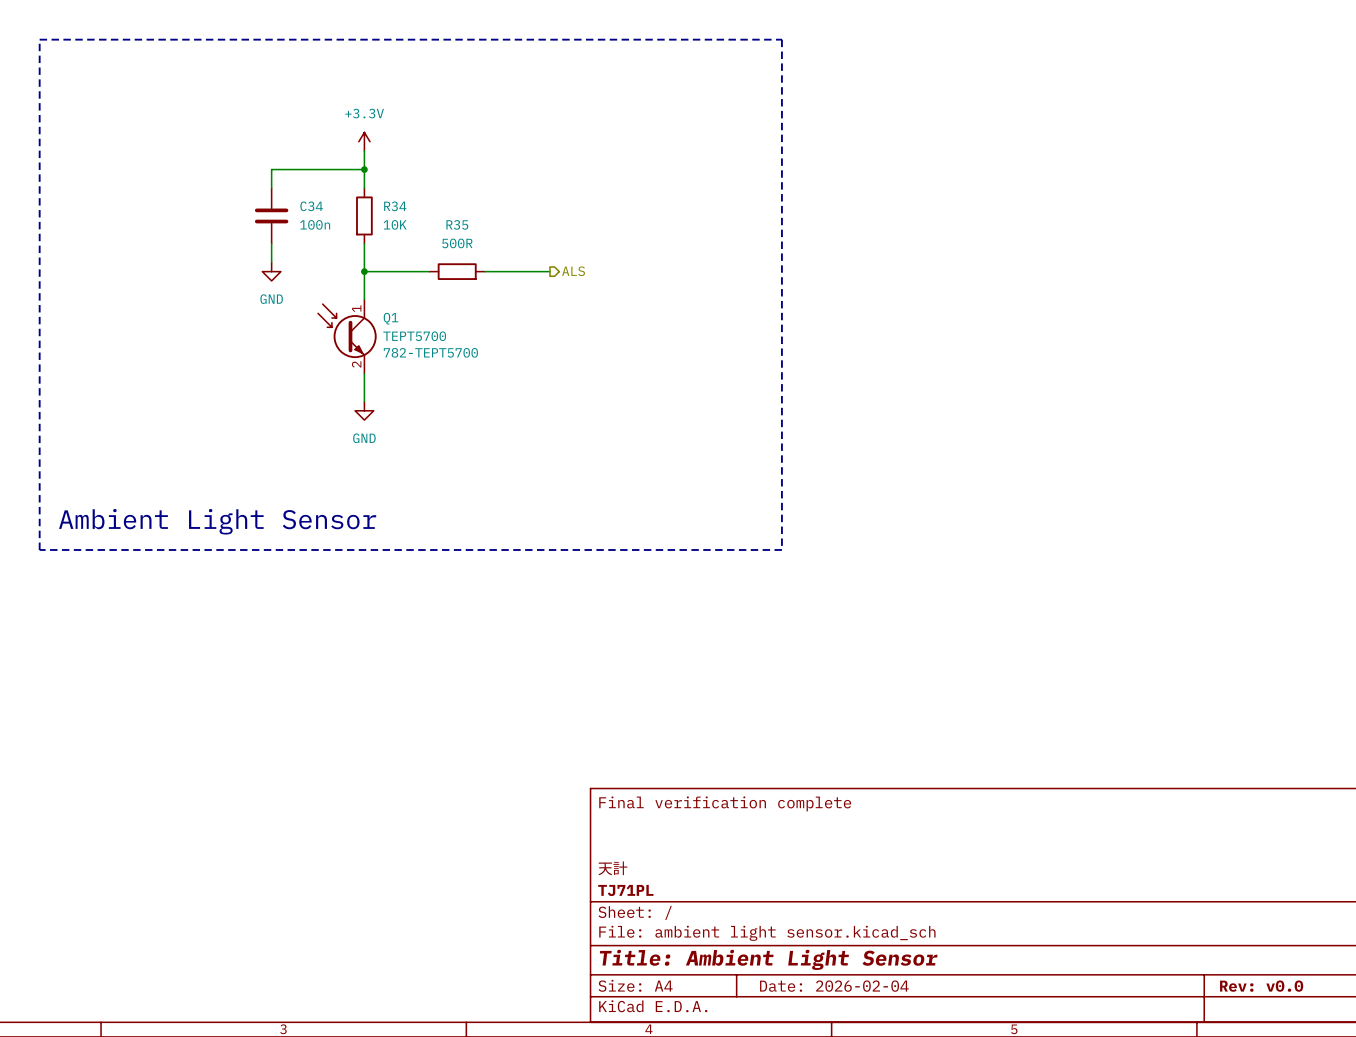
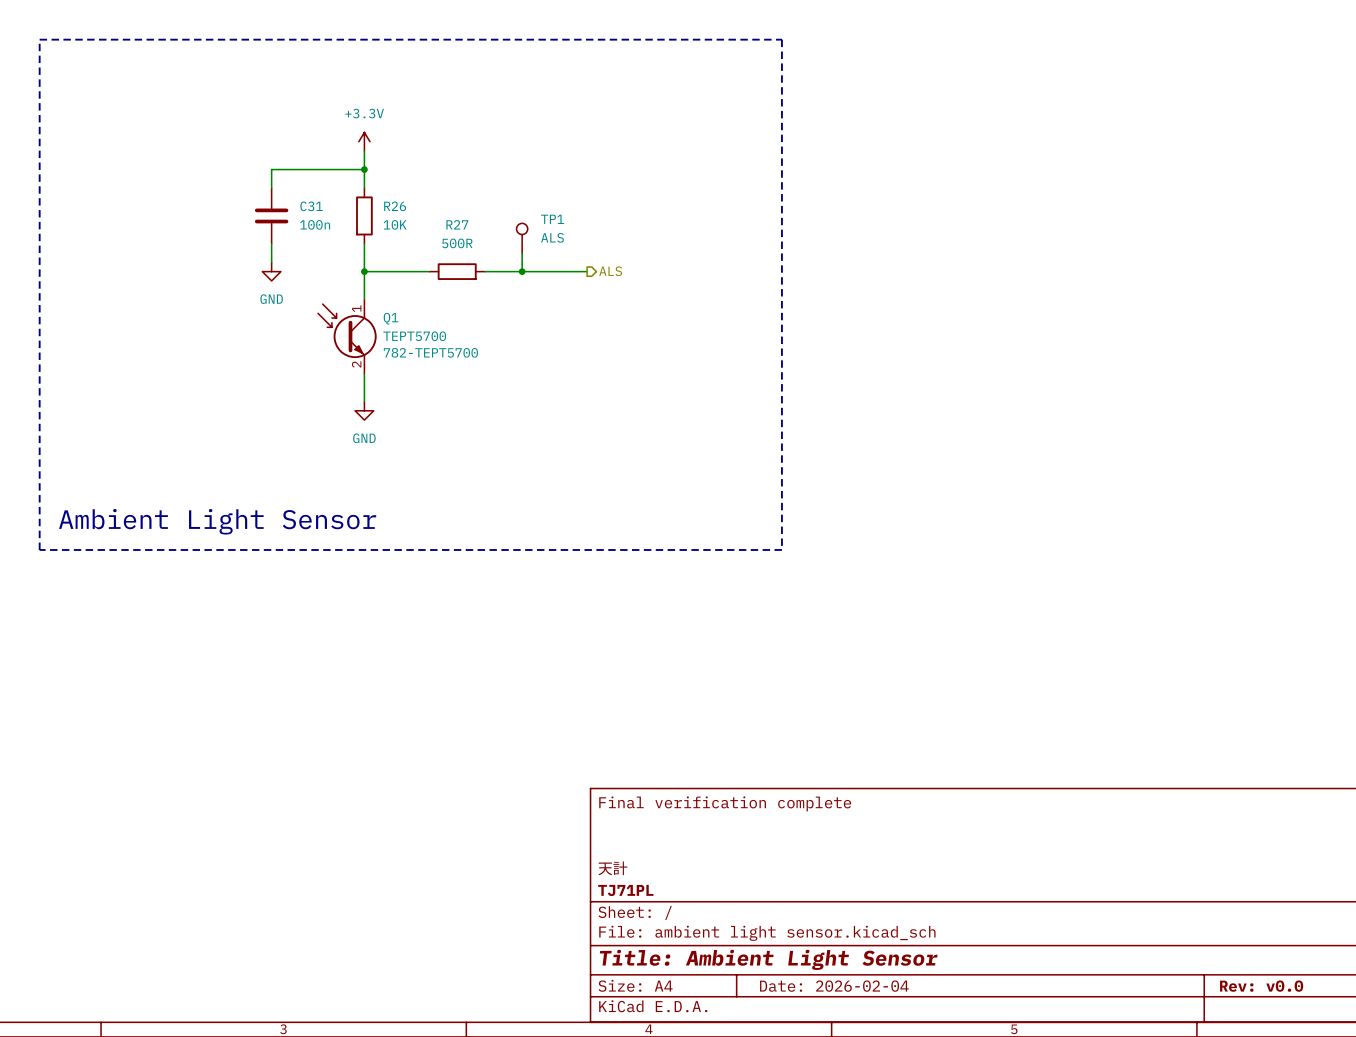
C34 name: C34 (311, 206) -> C31 (311, 206)
R34 name: R34 (395, 206) -> R26 (395, 206)
R35 name: R35 (457, 224) -> R27 (457, 224)
TP1: none -> ALS (522, 238)
wire: none -> (522, 253) (522, 271)
junction: none -> (522, 271)
wire: none -> (549, 271) (587, 271)
hierarchical label position: ALS (573, 271) -> ALS (610, 271)

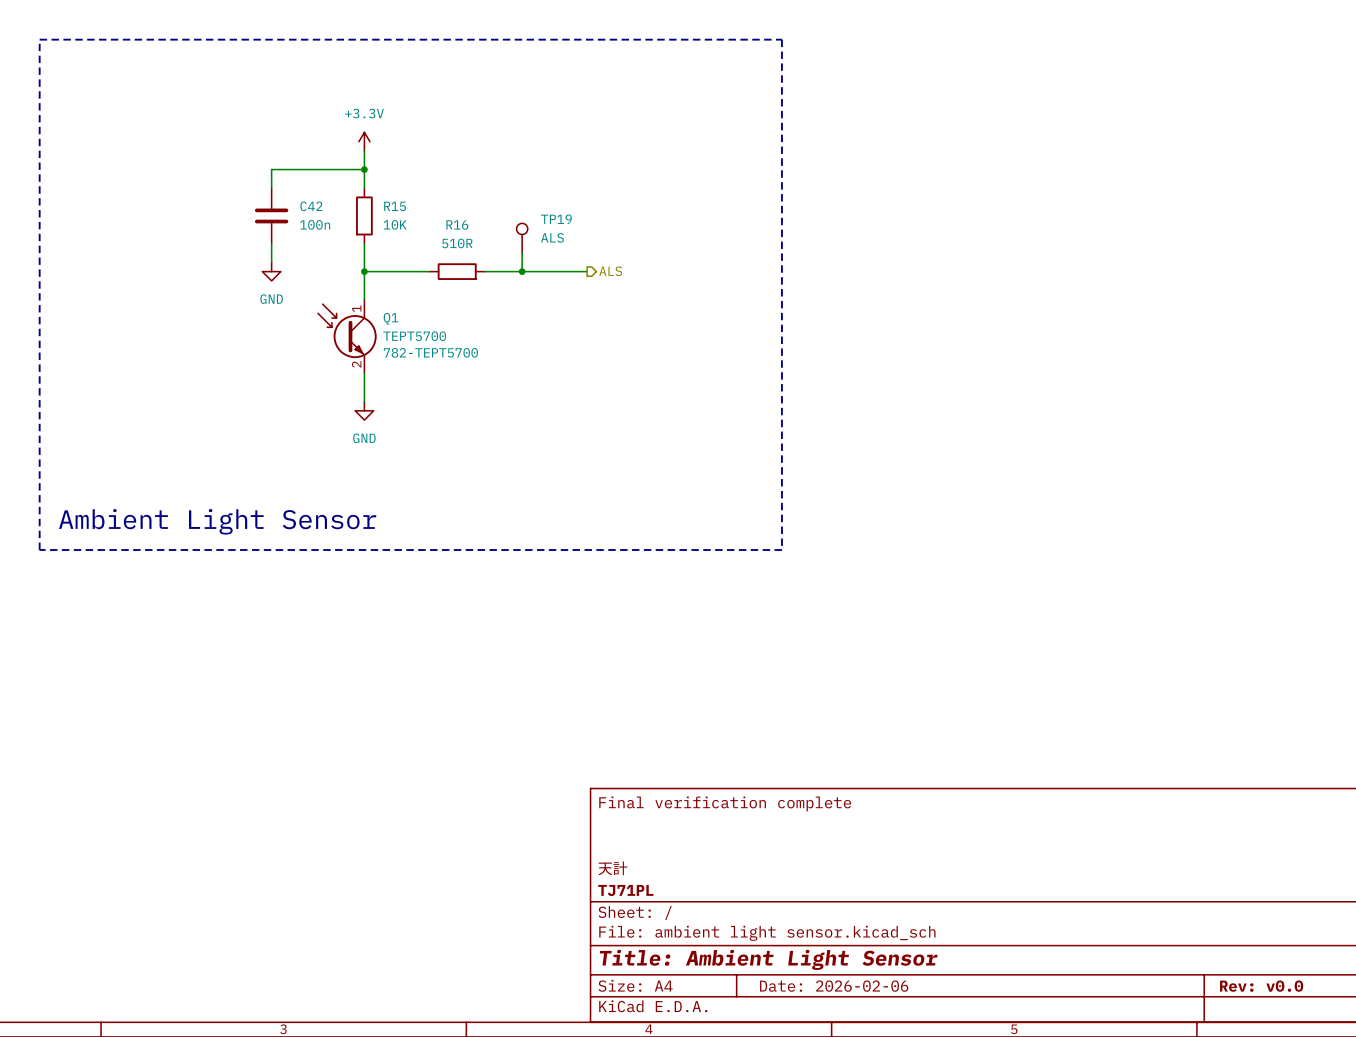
C31 name: C31 (311, 206) -> C42 (311, 206)
R26 name: R26 (395, 206) -> R15 (395, 206)
TP1 name: TP1 (552, 219) -> TP19 (556, 219)
R27 name: R27 (457, 224) -> R16 (457, 224)
R27 value: 500R (457, 243) -> 510R (457, 243)
title block: Date: 2026-02-04 (834, 986) -> Date: 2026-02-06 (834, 986)

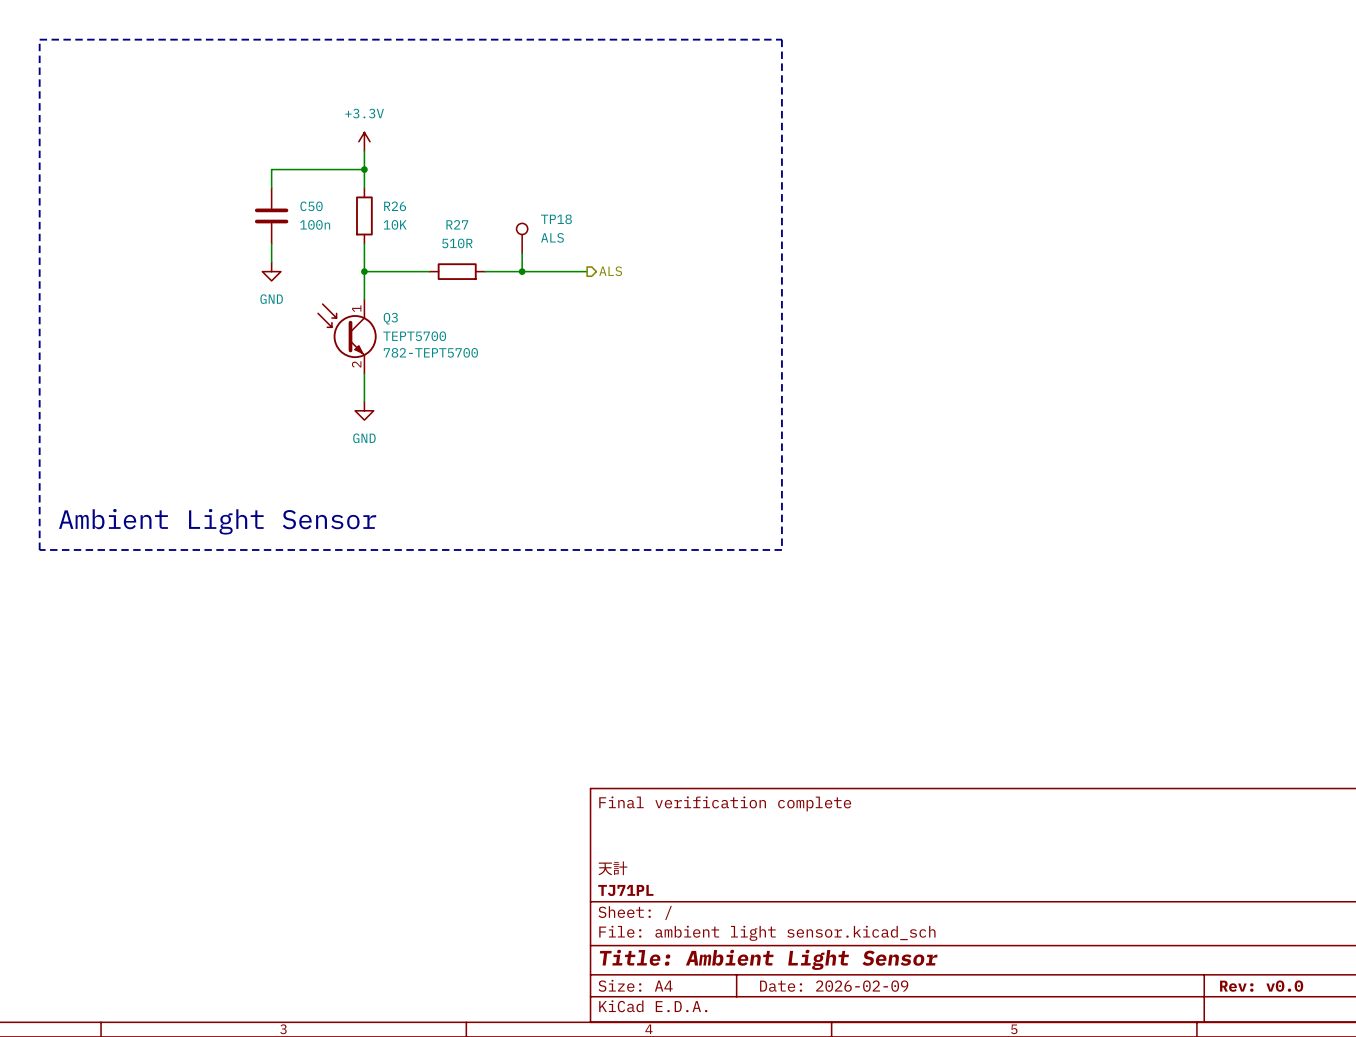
C42 name: C42 (311, 206) -> C50 (311, 206)
R15 name: R15 (395, 206) -> R26 (395, 206)
TP19 name: TP19 (556, 219) -> TP18 (556, 219)
R16 name: R16 (457, 224) -> R27 (457, 224)
Q1 name: Q1 (391, 318) -> Q3 (390, 318)
title block: Date: 2026-02-06 (834, 986) -> Date: 2026-02-09 (834, 986)

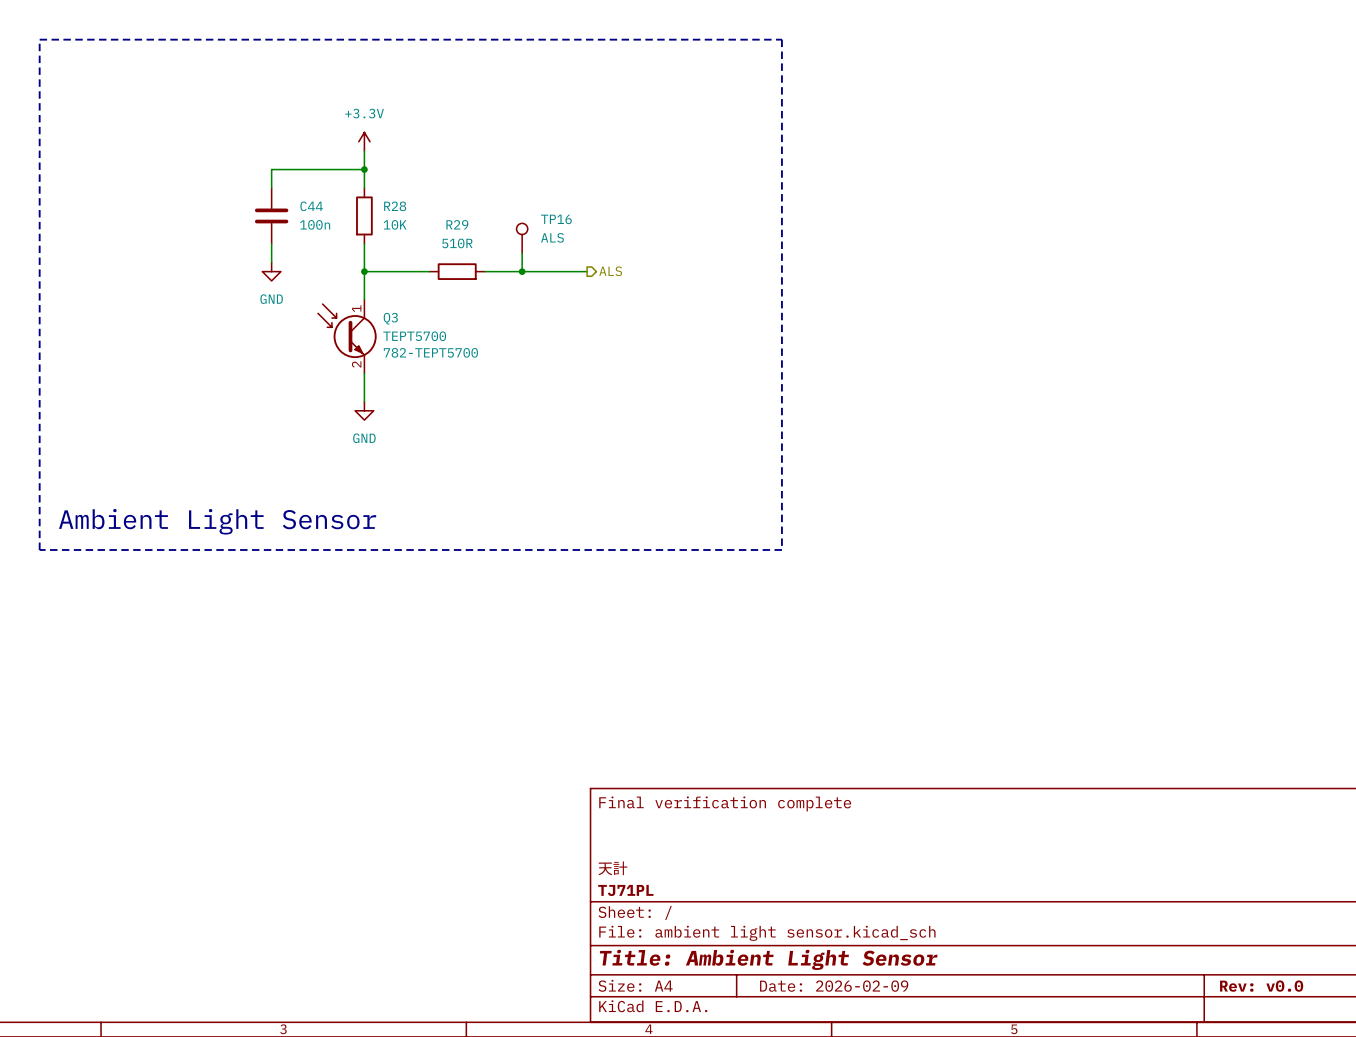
C50 name: C50 (311, 206) -> C44 (311, 206)
R26 name: R26 (395, 206) -> R28 (395, 206)
TP18 name: TP18 (556, 219) -> TP16 (556, 219)
R27 name: R27 (457, 224) -> R29 (457, 224)

